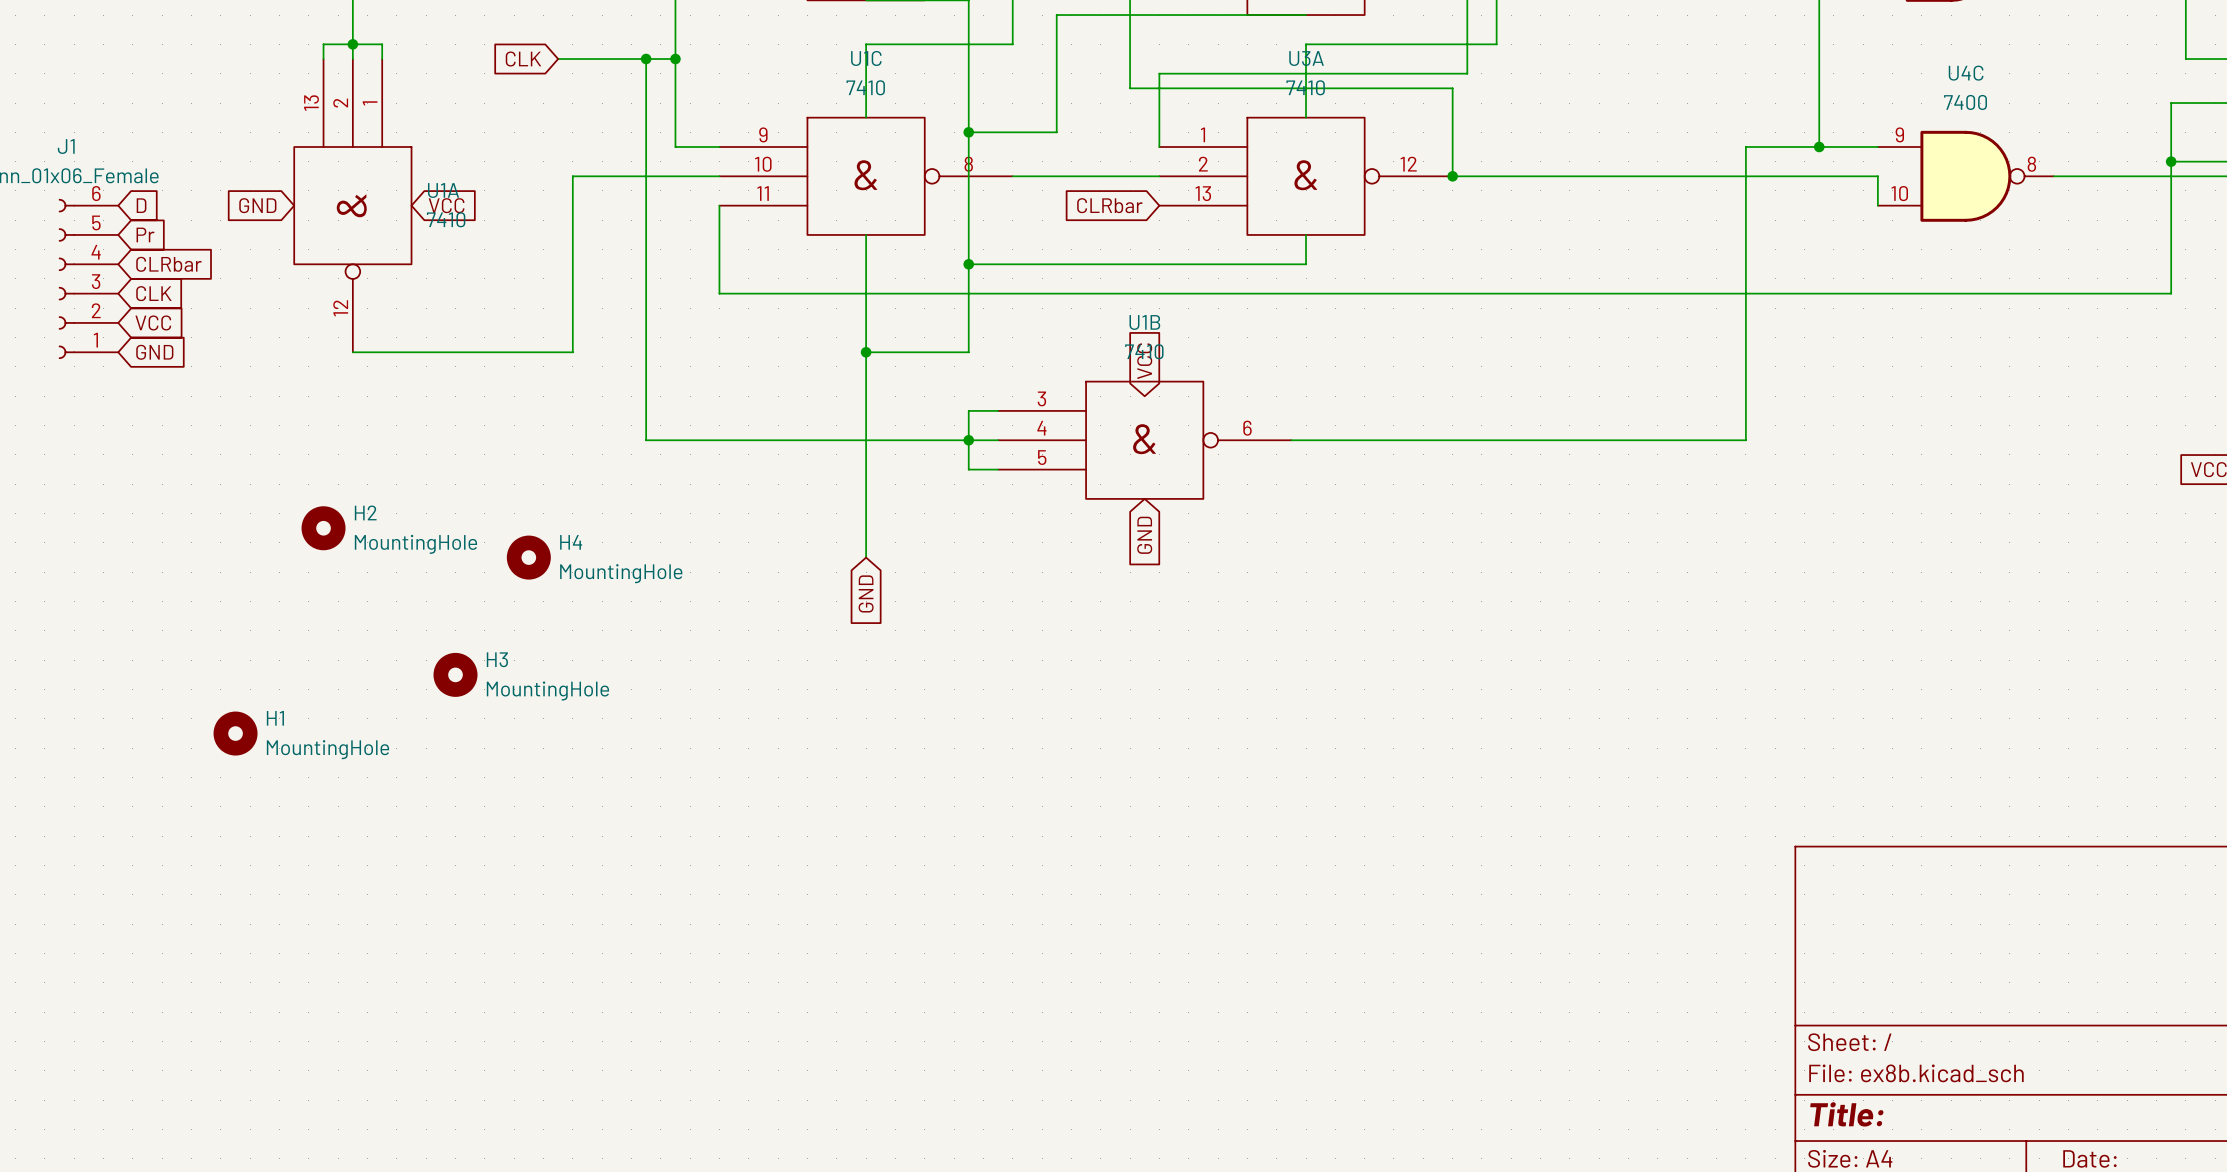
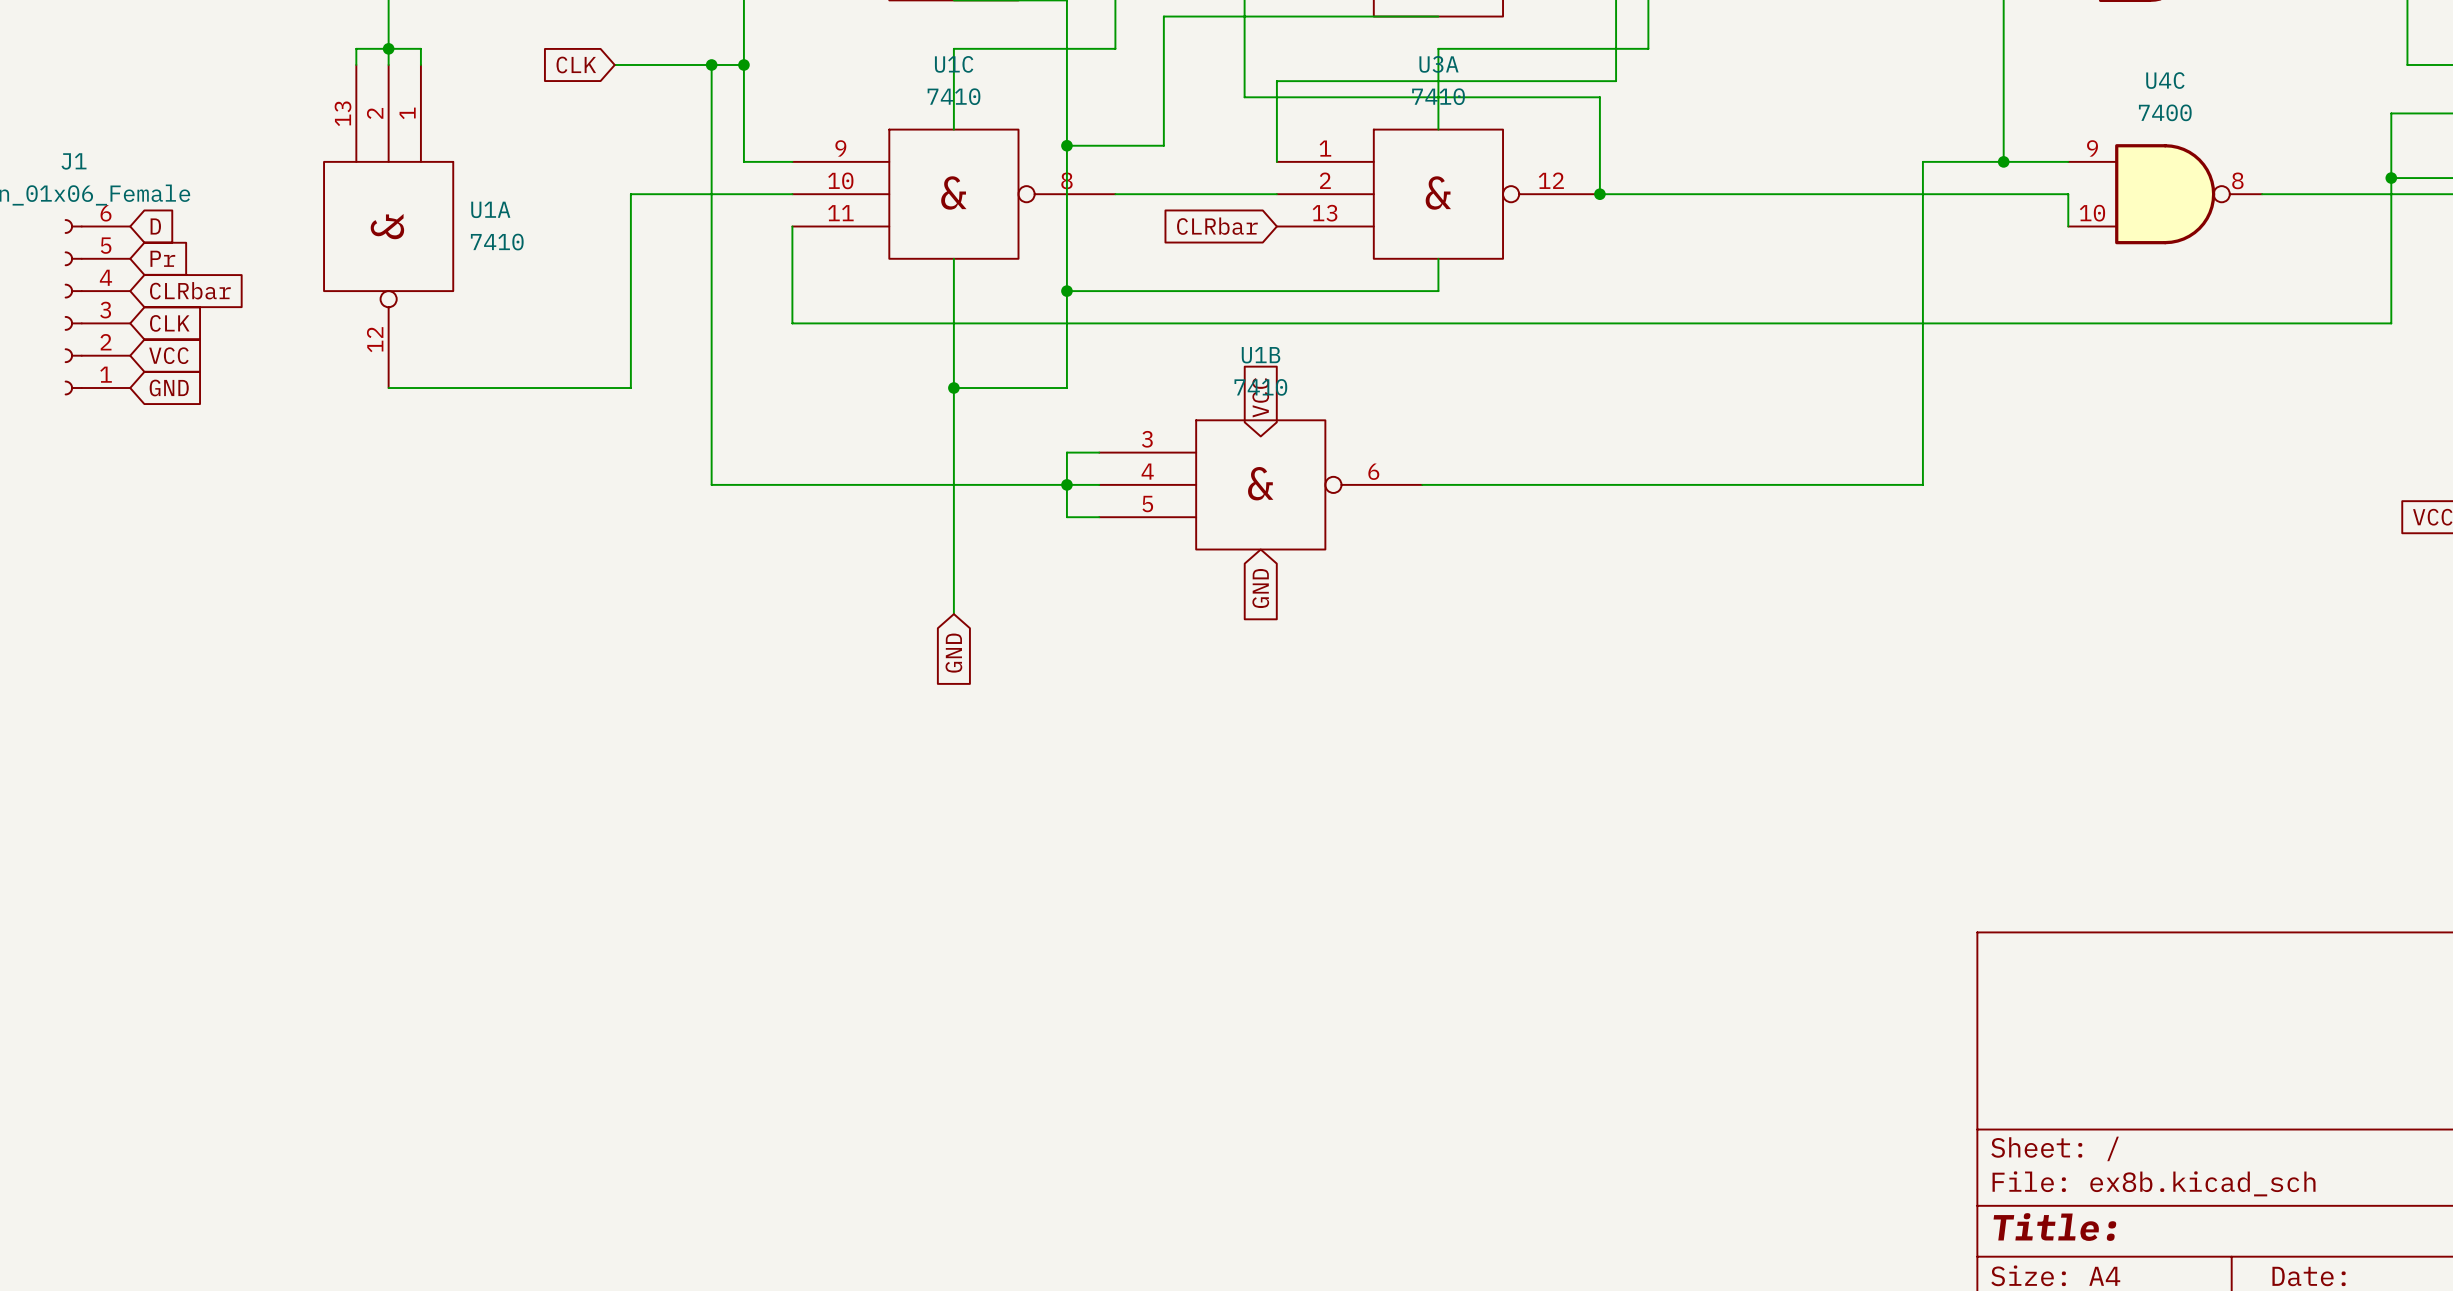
global label: GND (257, 205) -> none
global label: VCC (446, 205) -> none
H2: MountingHole (323, 528) -> none
H4: MountingHole (528, 557) -> none
H3: MountingHole (455, 674) -> none
H1: MountingHole (235, 733) -> none

